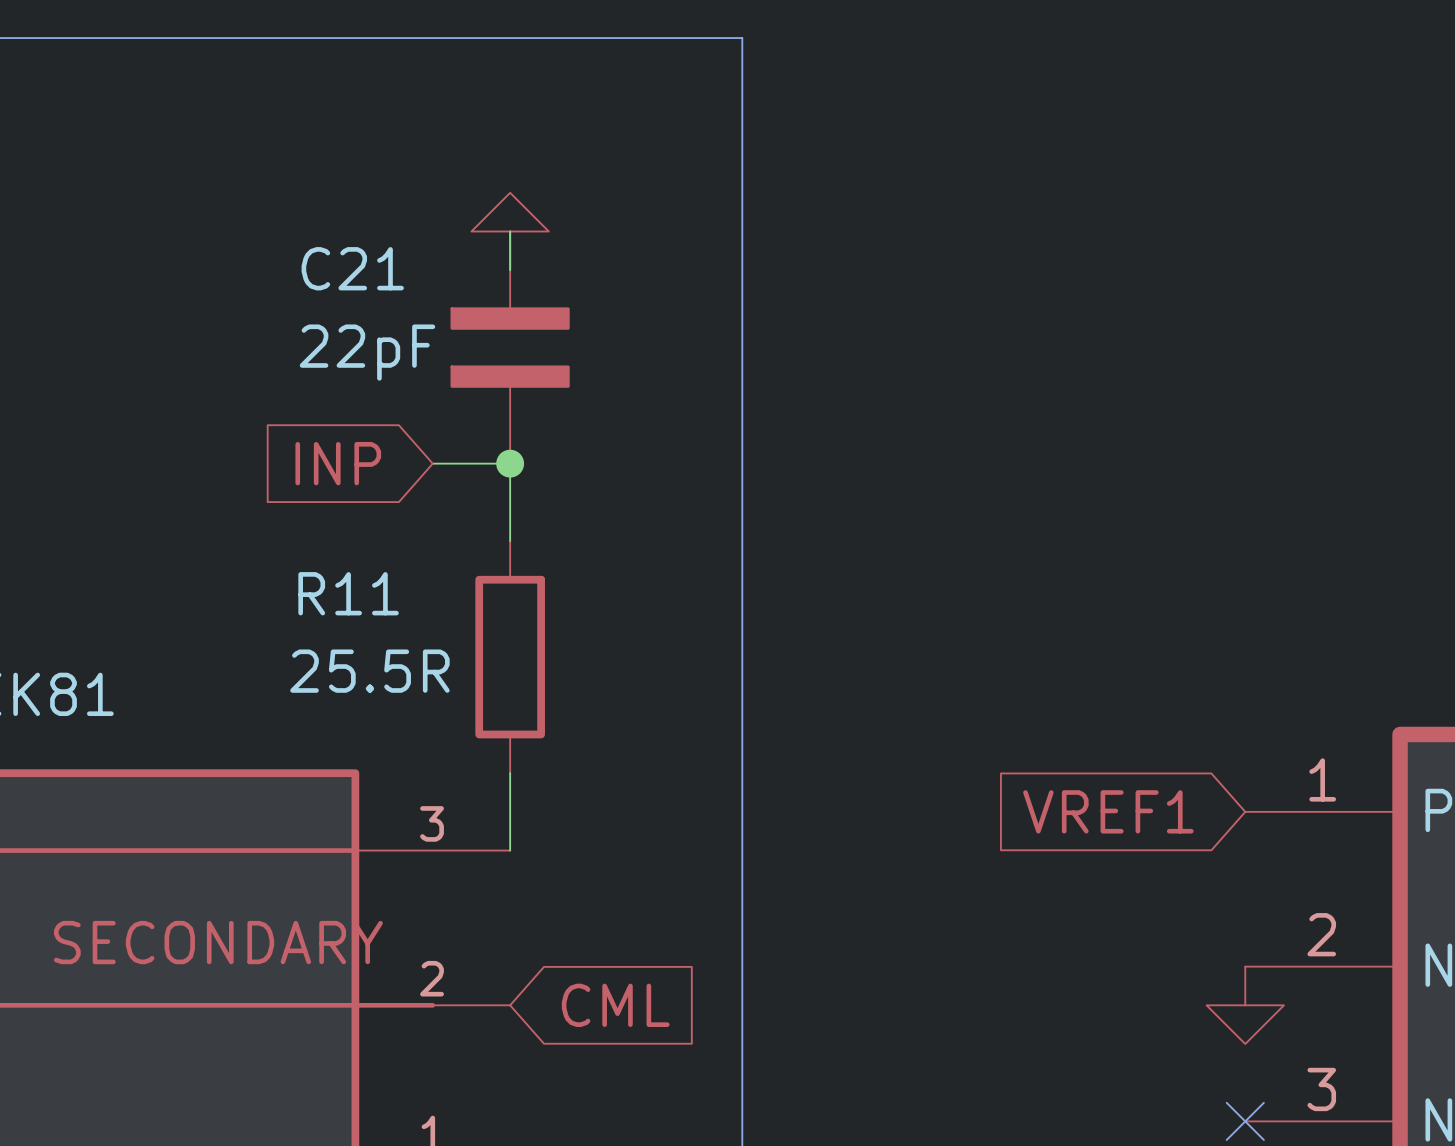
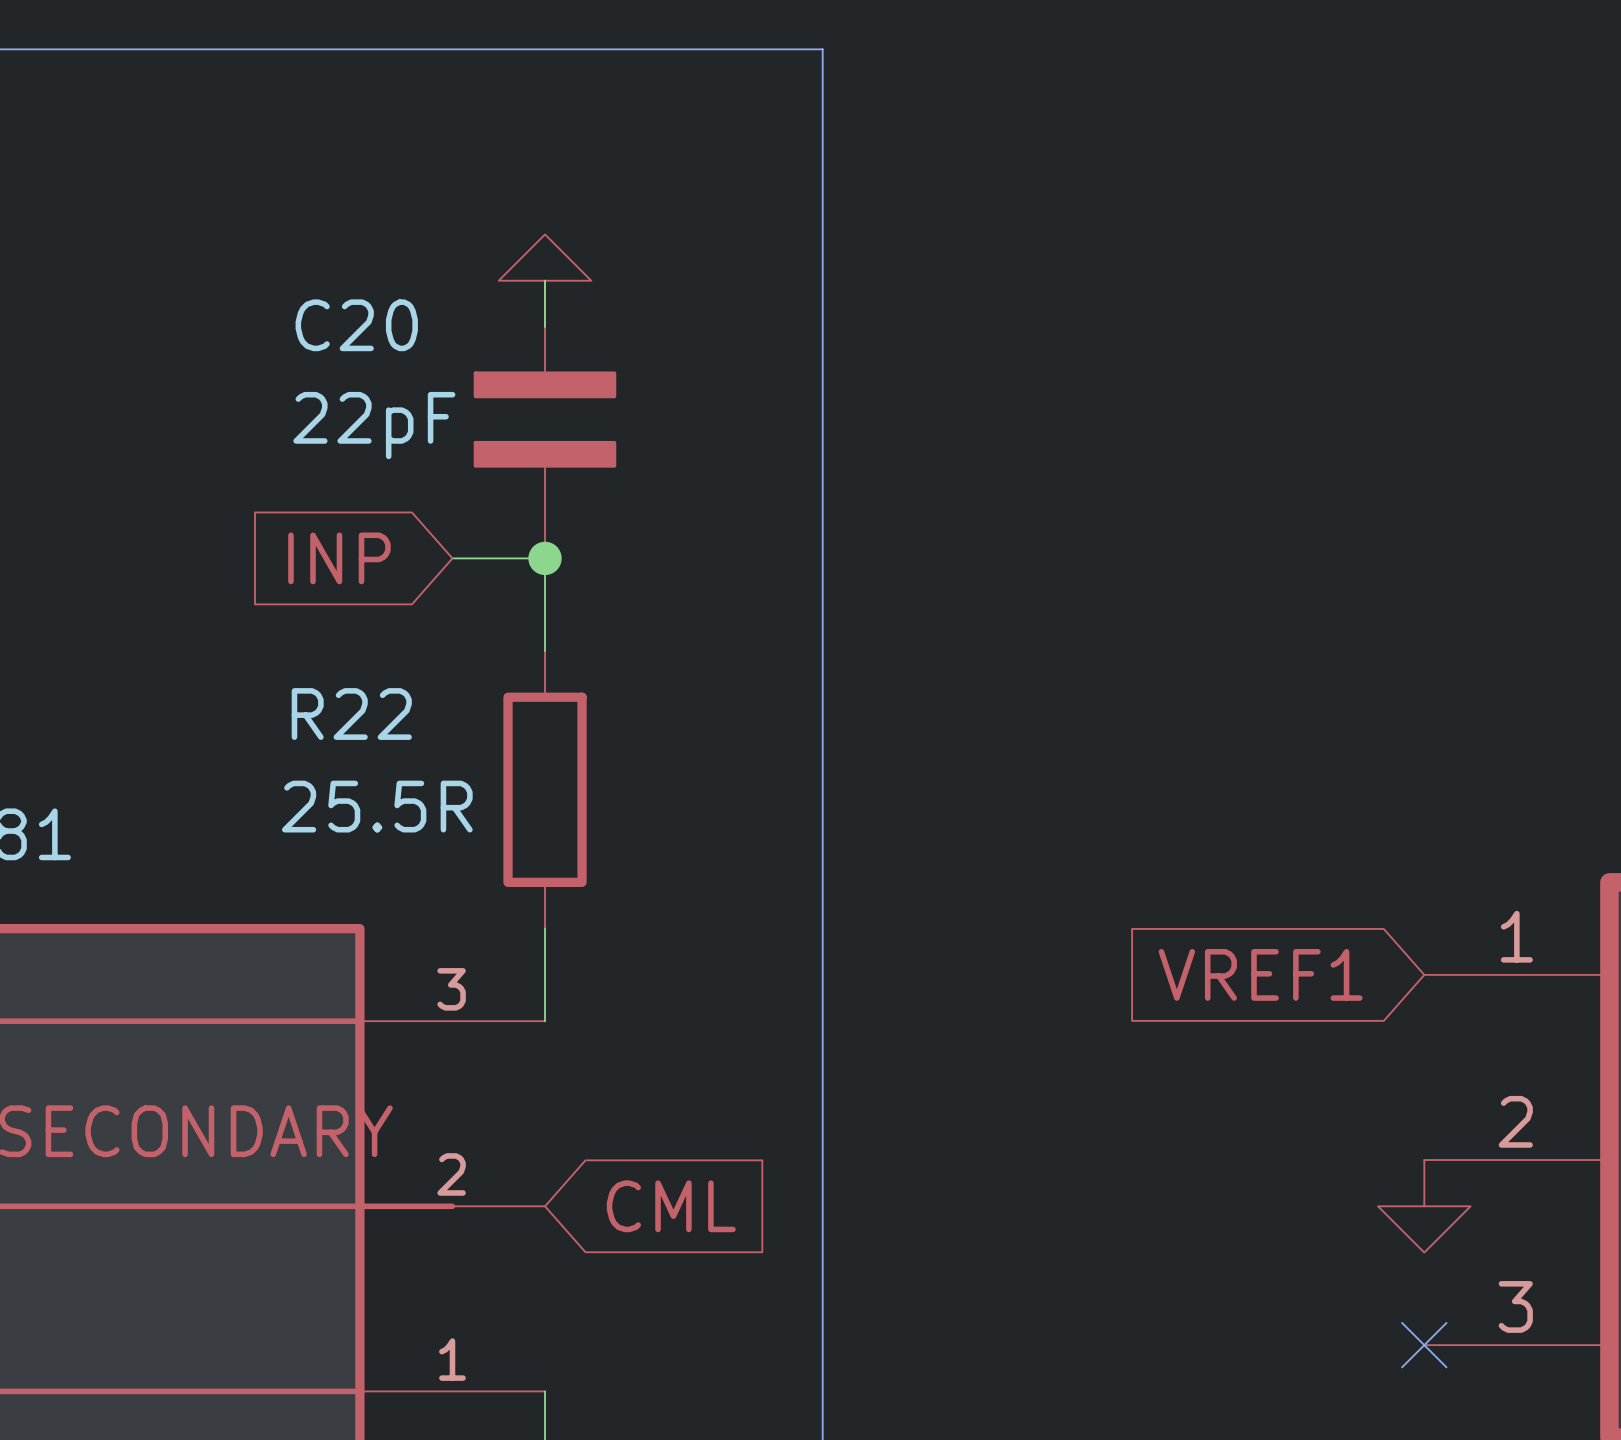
C21 name: C21 (352, 268) -> C20 (356, 325)
R11 name: R11 (348, 593) -> R22 (351, 714)

